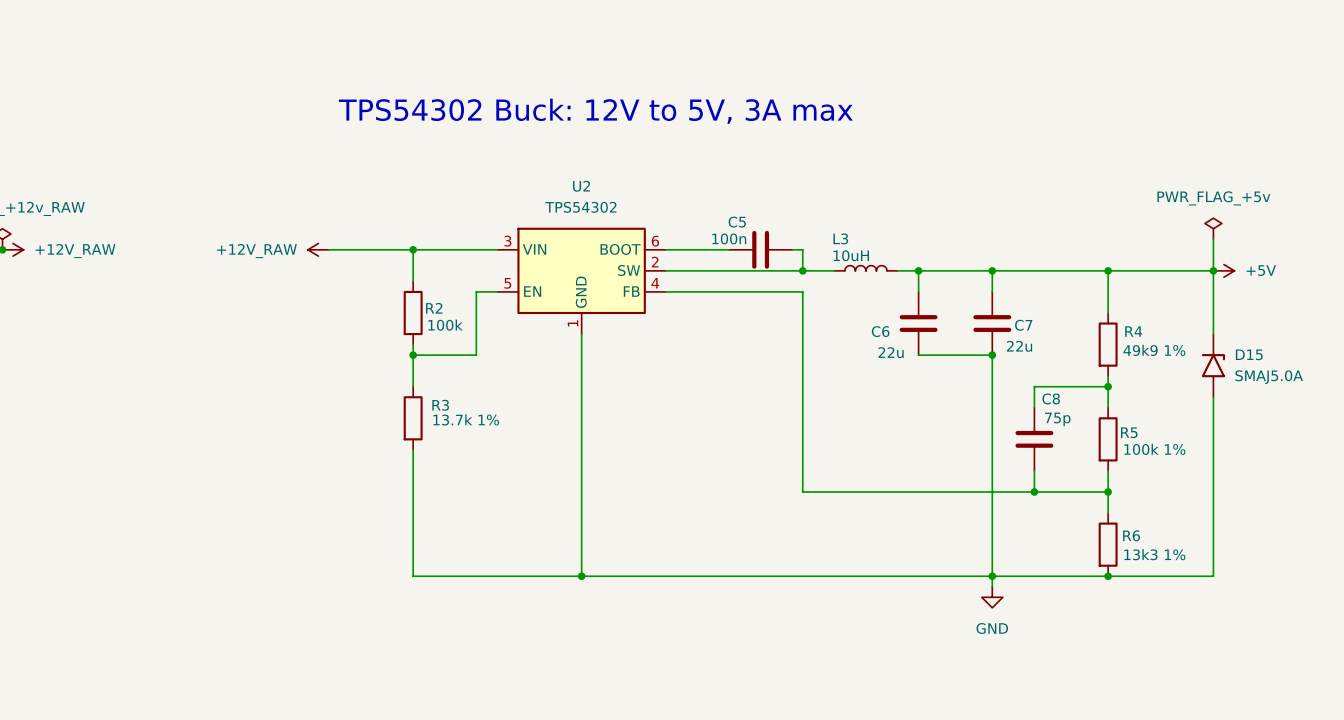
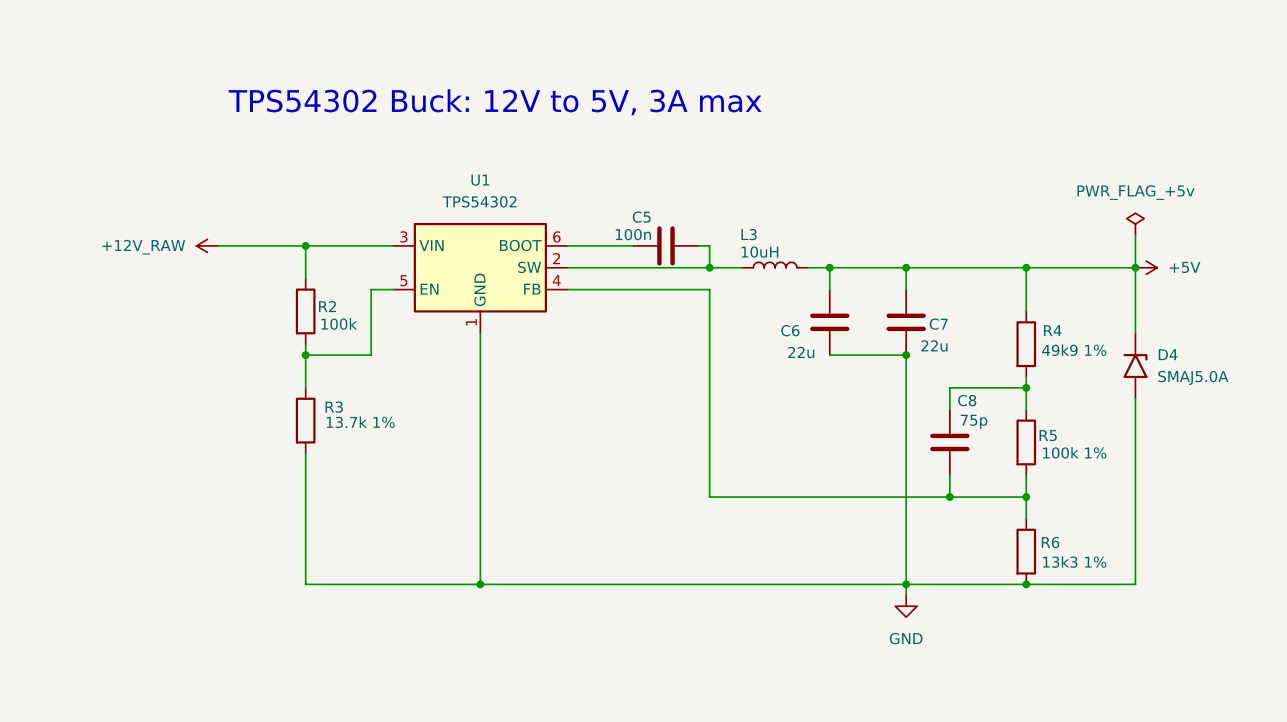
U2 name: U2 (581, 186) -> U1 (480, 180)
D15 name: D15 (1249, 354) -> D4 (1168, 354)

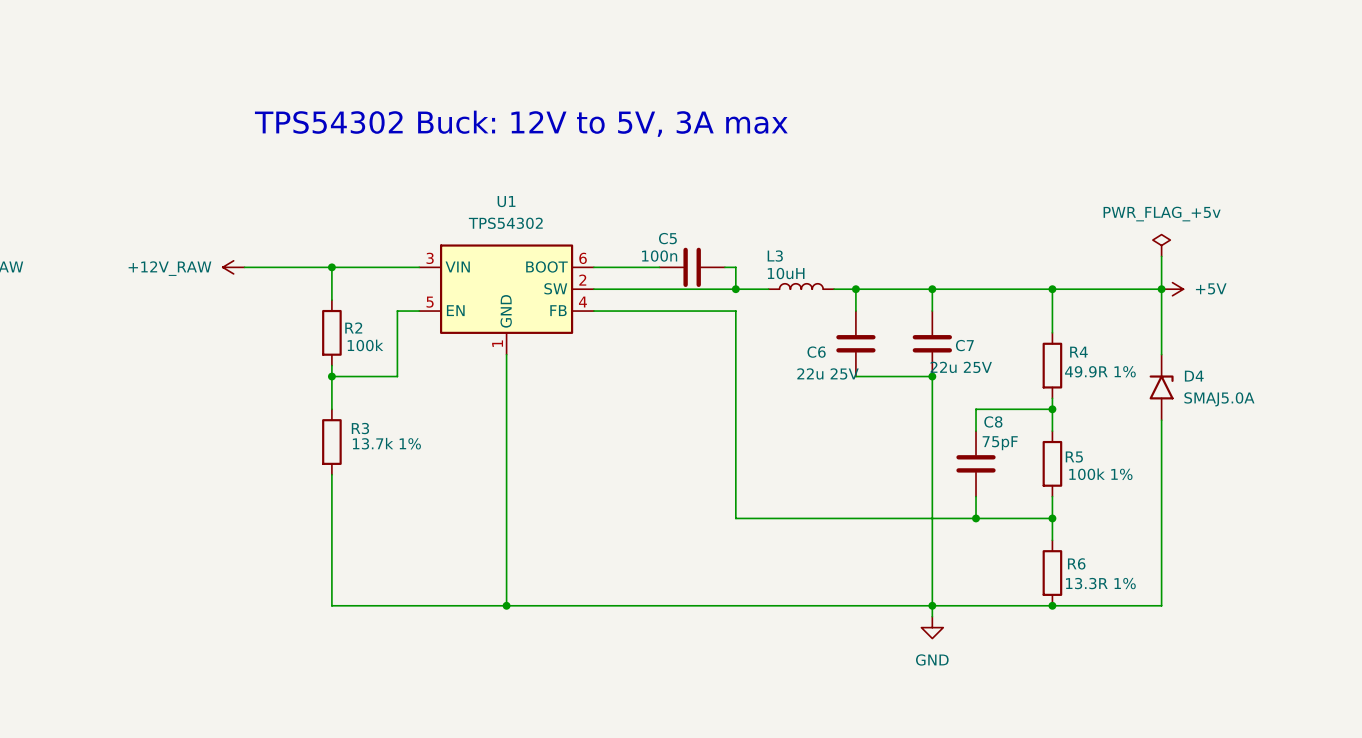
C7 value: 22u (934, 345) -> 22u 25V (961, 367)
R4 value: 49k9 1% (1074, 350) -> 49.9R 1% (1100, 371)
C6 value: 22u (801, 352) -> 22u 25V (828, 373)
C8 value: 75p (974, 421) -> 75pF (1000, 443)
R6 value: 13k3 1% (1074, 562) -> 13.3R 1% (1100, 583)

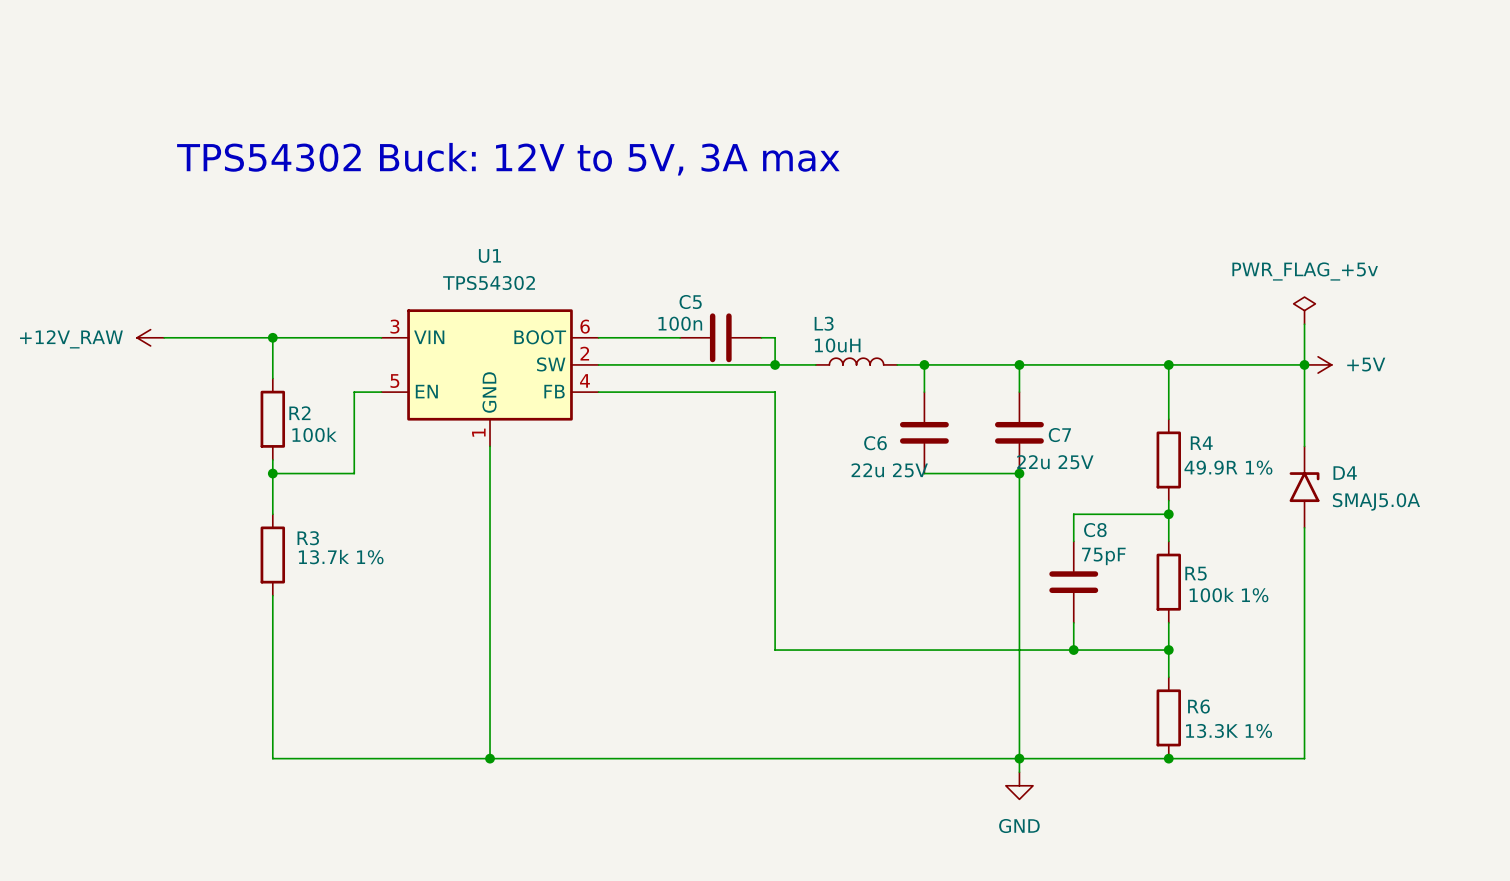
R6 value: 13.3R 1% (1100, 583) -> 13.3K 1% (1229, 730)

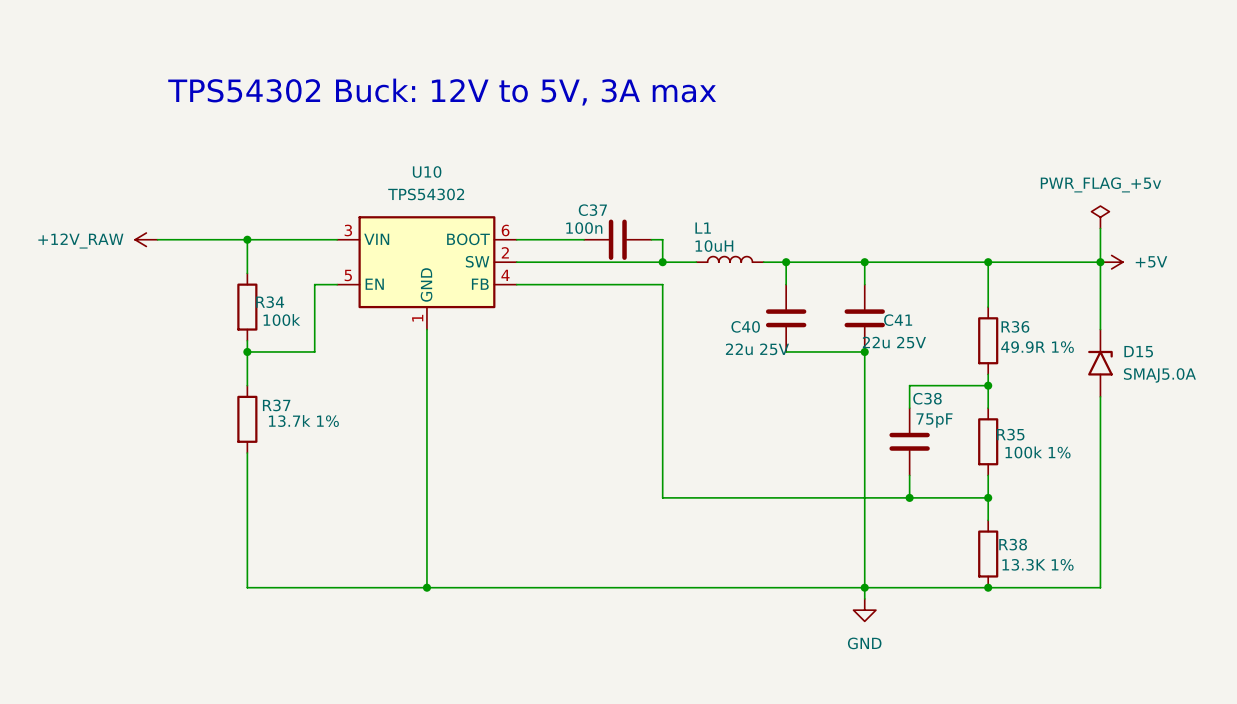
U1 name: U1 (489, 255) -> U10 (427, 171)
C5 name: C5 (690, 302) -> C37 (592, 210)
L3 name: L3 (824, 323) -> L1 (703, 228)
R2 name: R2 (299, 413) -> R34 (270, 302)
C7 name: C7 (1059, 435) -> C41 (898, 320)
C6 name: C6 (875, 443) -> C40 (745, 326)
R4 name: R4 (1201, 443) -> R36 (1015, 326)
D4 name: D4 (1345, 473) -> D15 (1138, 351)
C8 name: C8 (1095, 530) -> C38 (927, 398)
R3 name: R3 (308, 538) -> R37 (276, 405)
R5 name: R5 (1196, 573) -> R35 (1010, 434)
R6 name: R6 (1198, 706) -> R38 (1013, 544)

